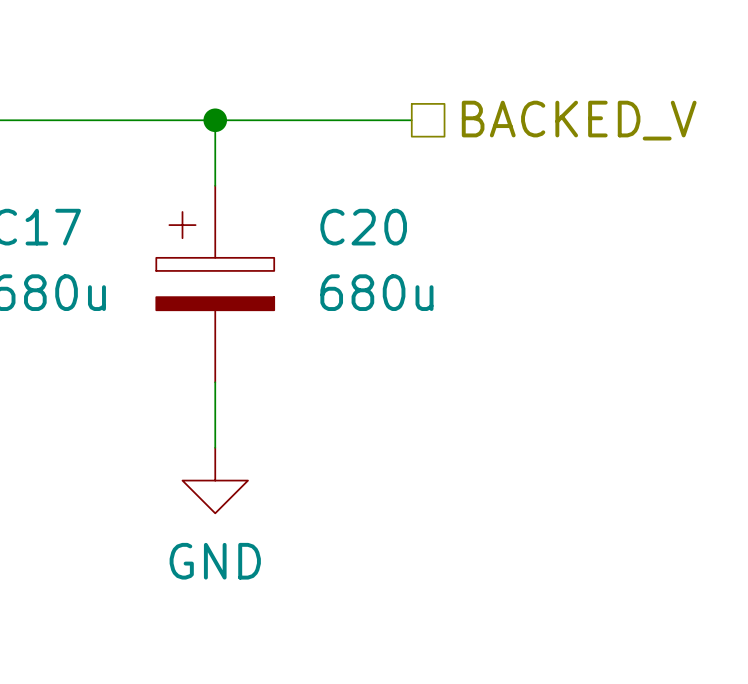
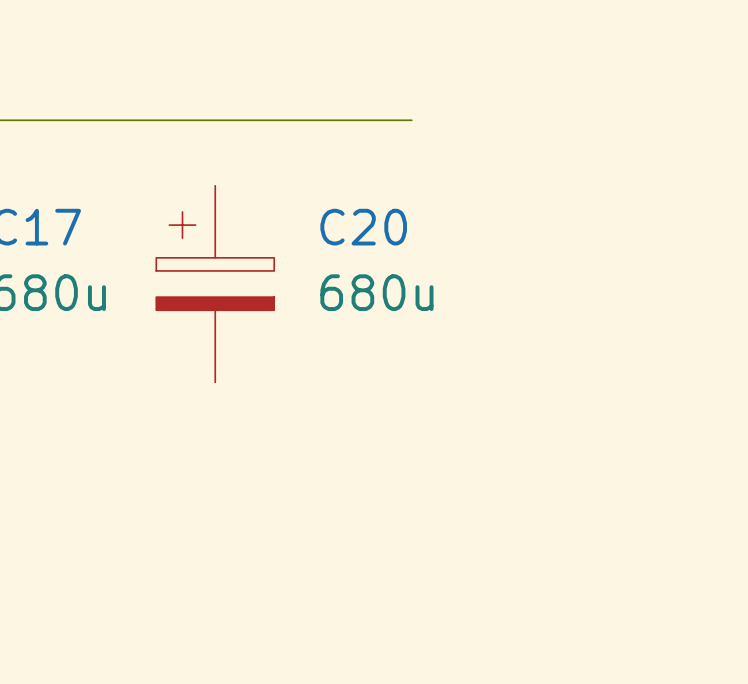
wire: (215, 120) (215, 185) -> none
junction: (215, 120) -> none
hierarchical label: BACKED_V (579, 120) -> none
wire: (215, 382) (215, 447) -> none
power symbol: GND (215, 480) -> none

